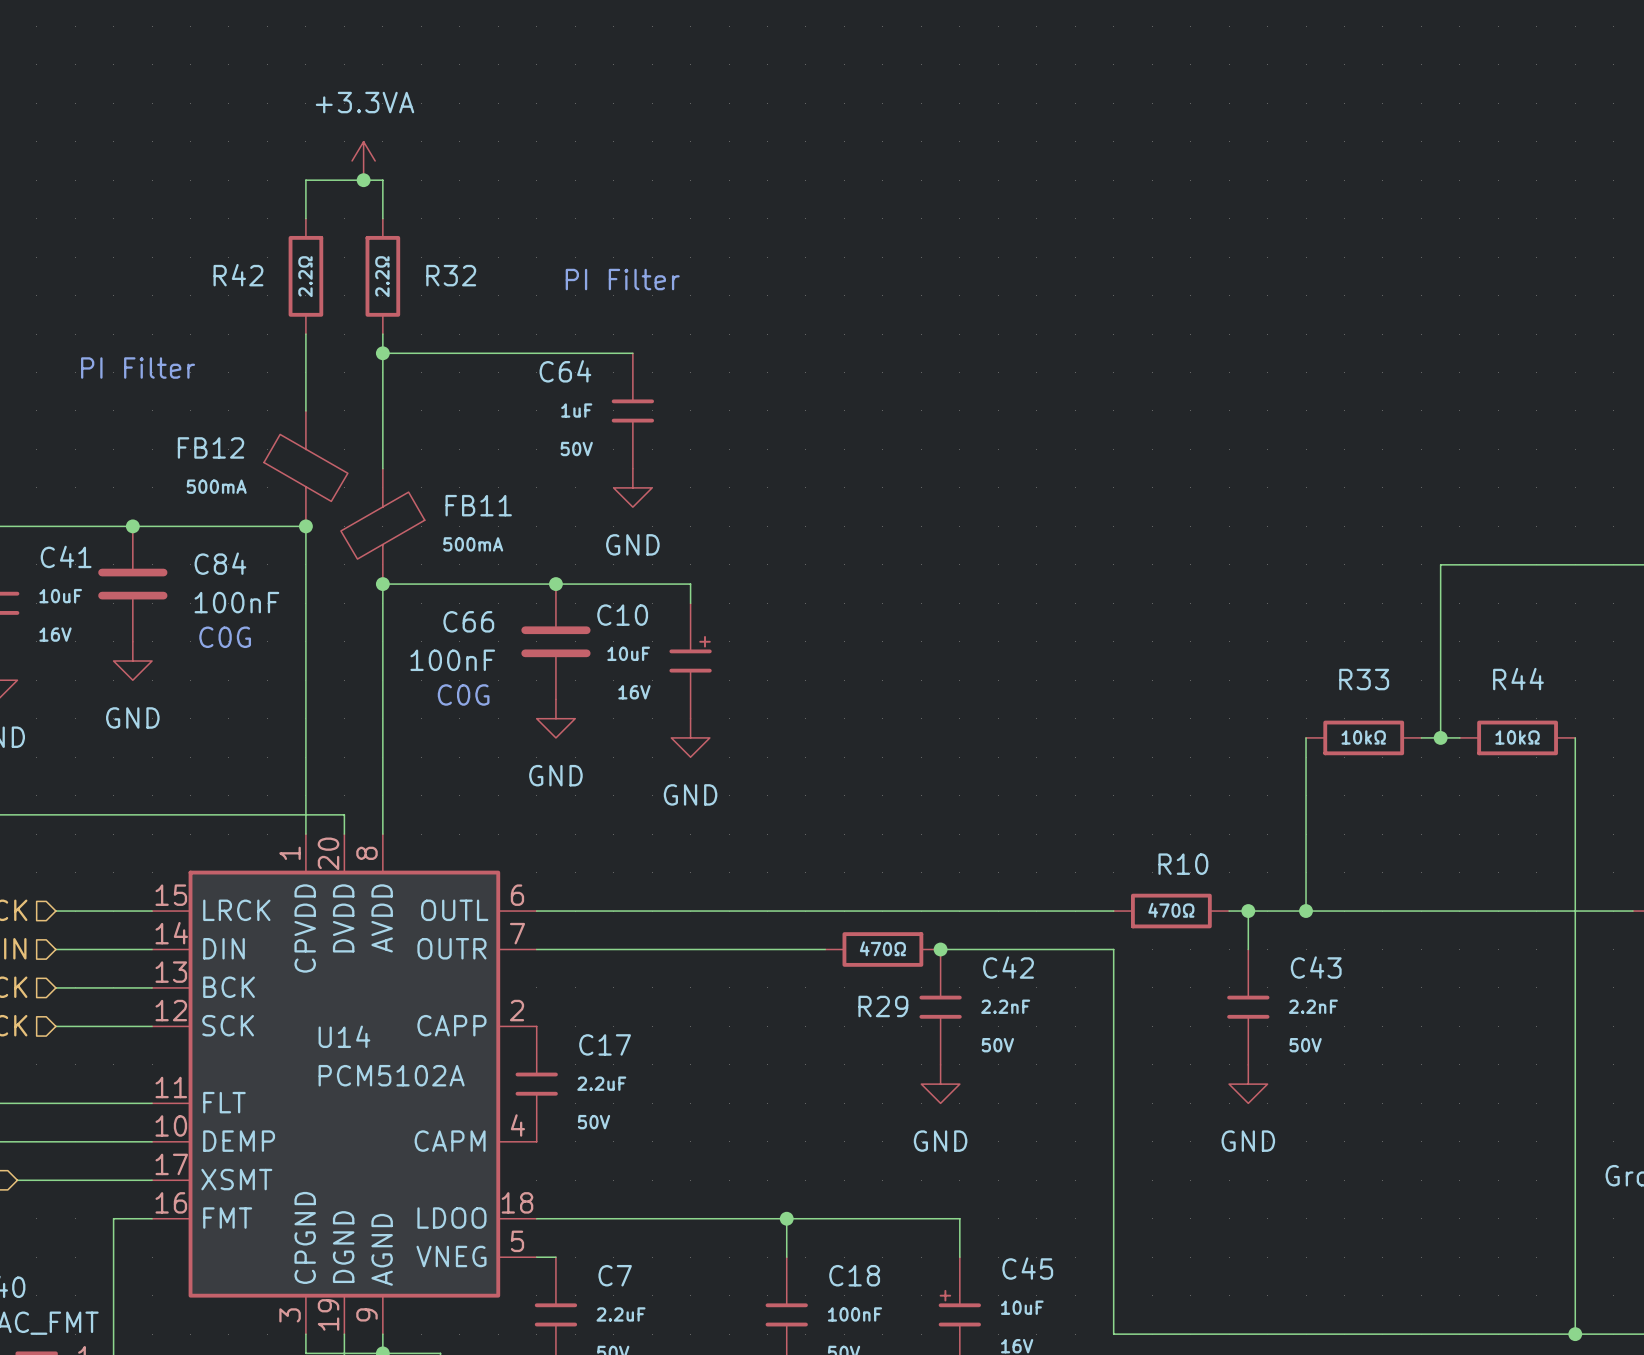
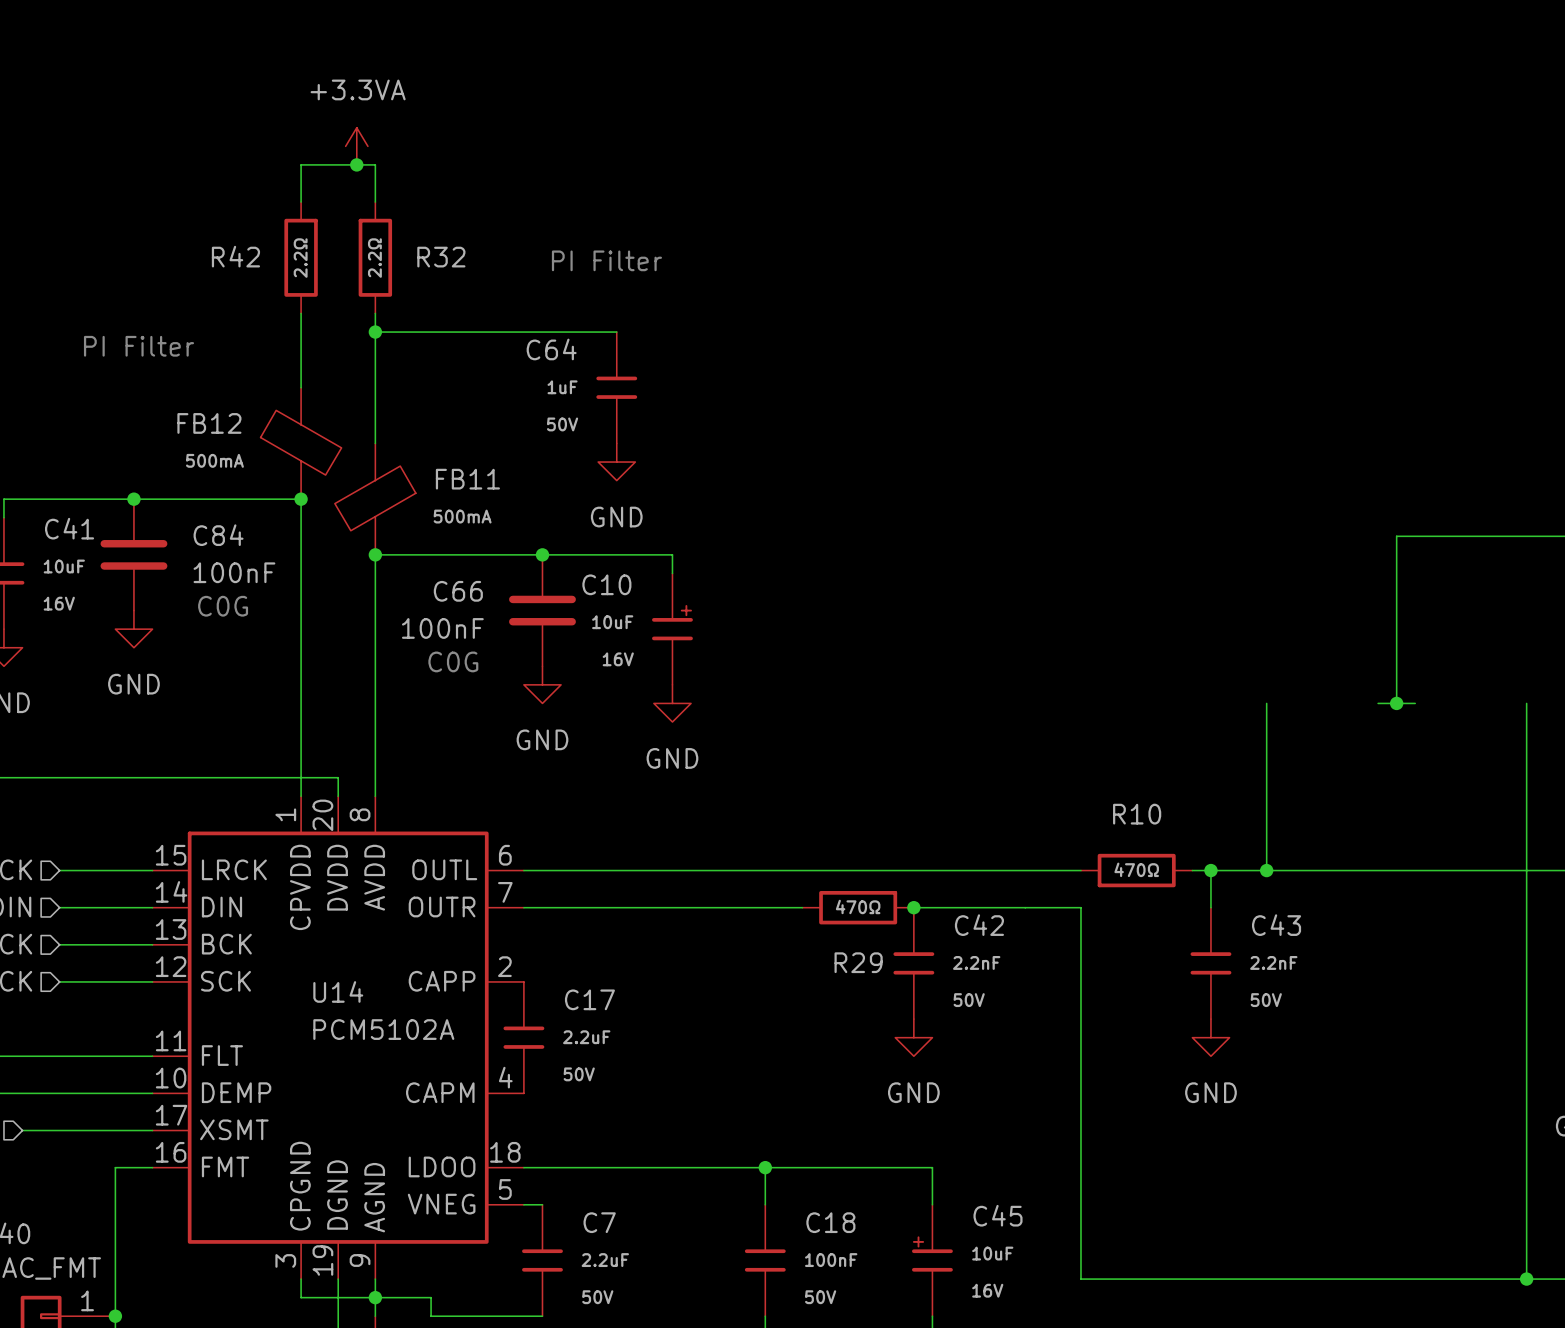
R33: 10kΩ (1363, 737) -> none
R44: 10kΩ (1517, 737) -> none
R10 name position: R10 (1183, 864) -> R10 (1137, 814)

